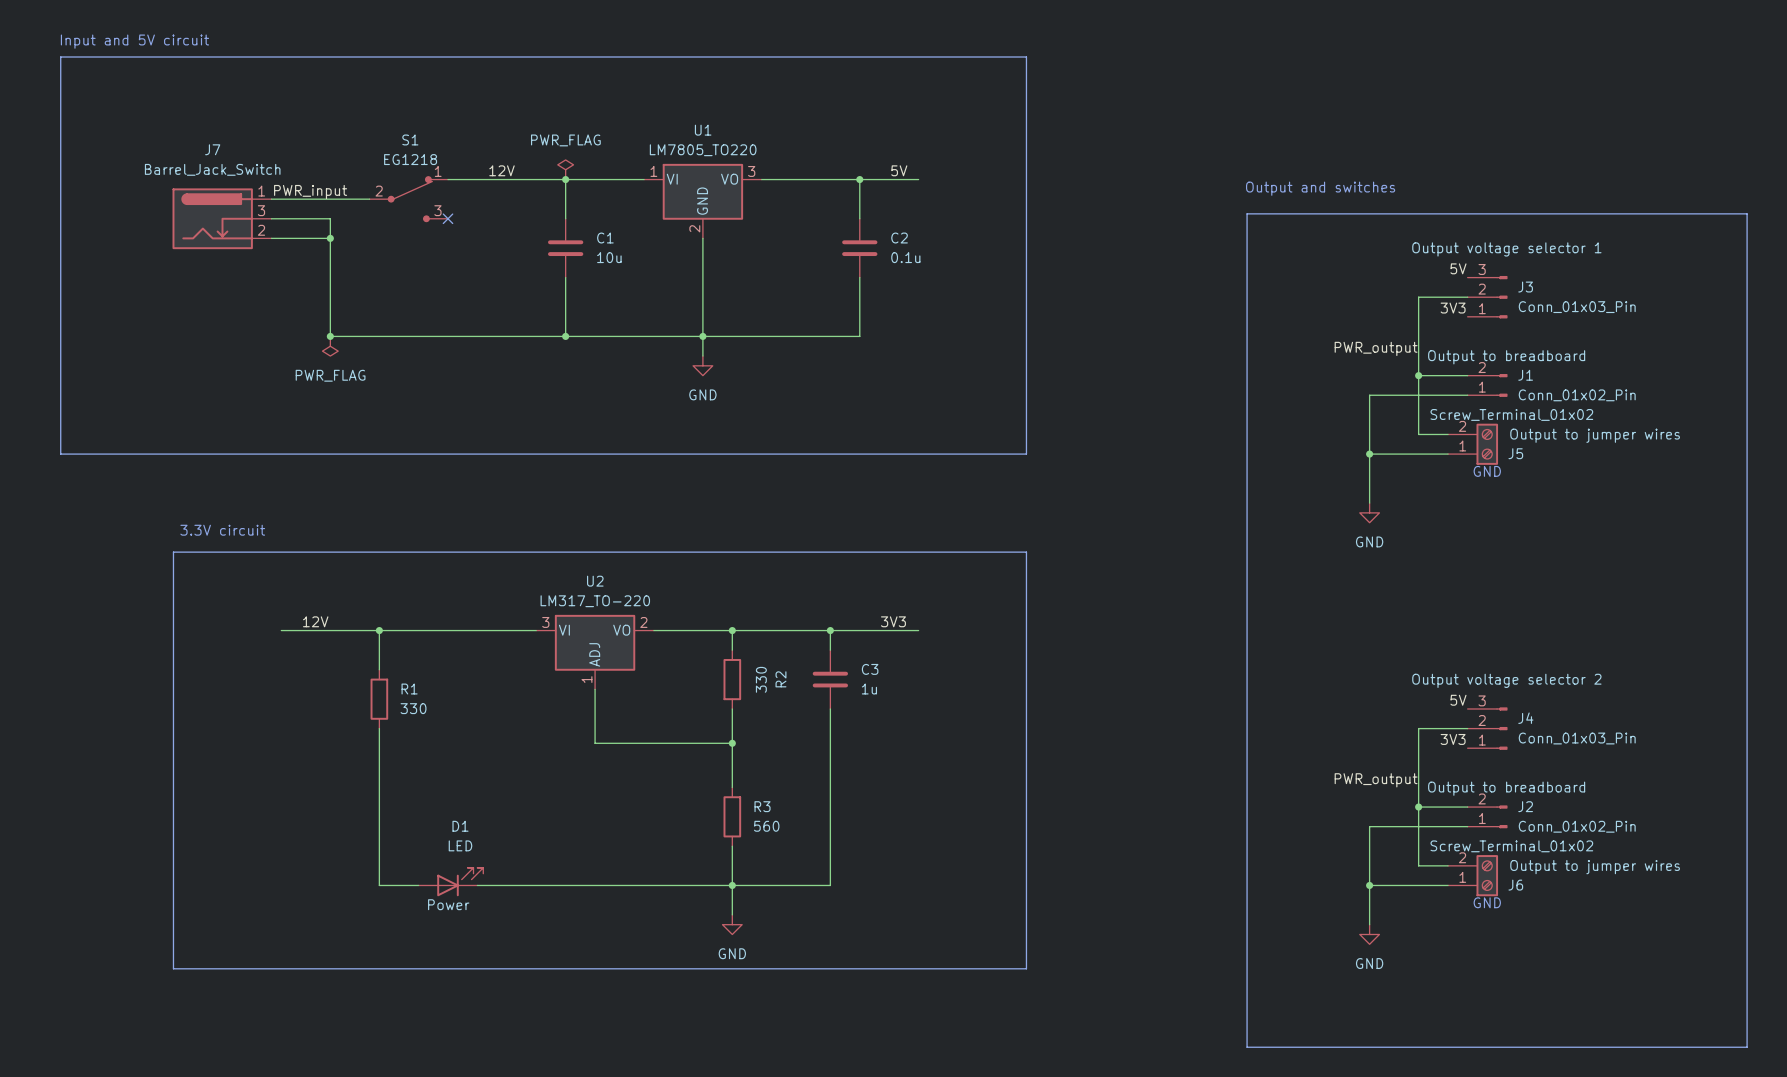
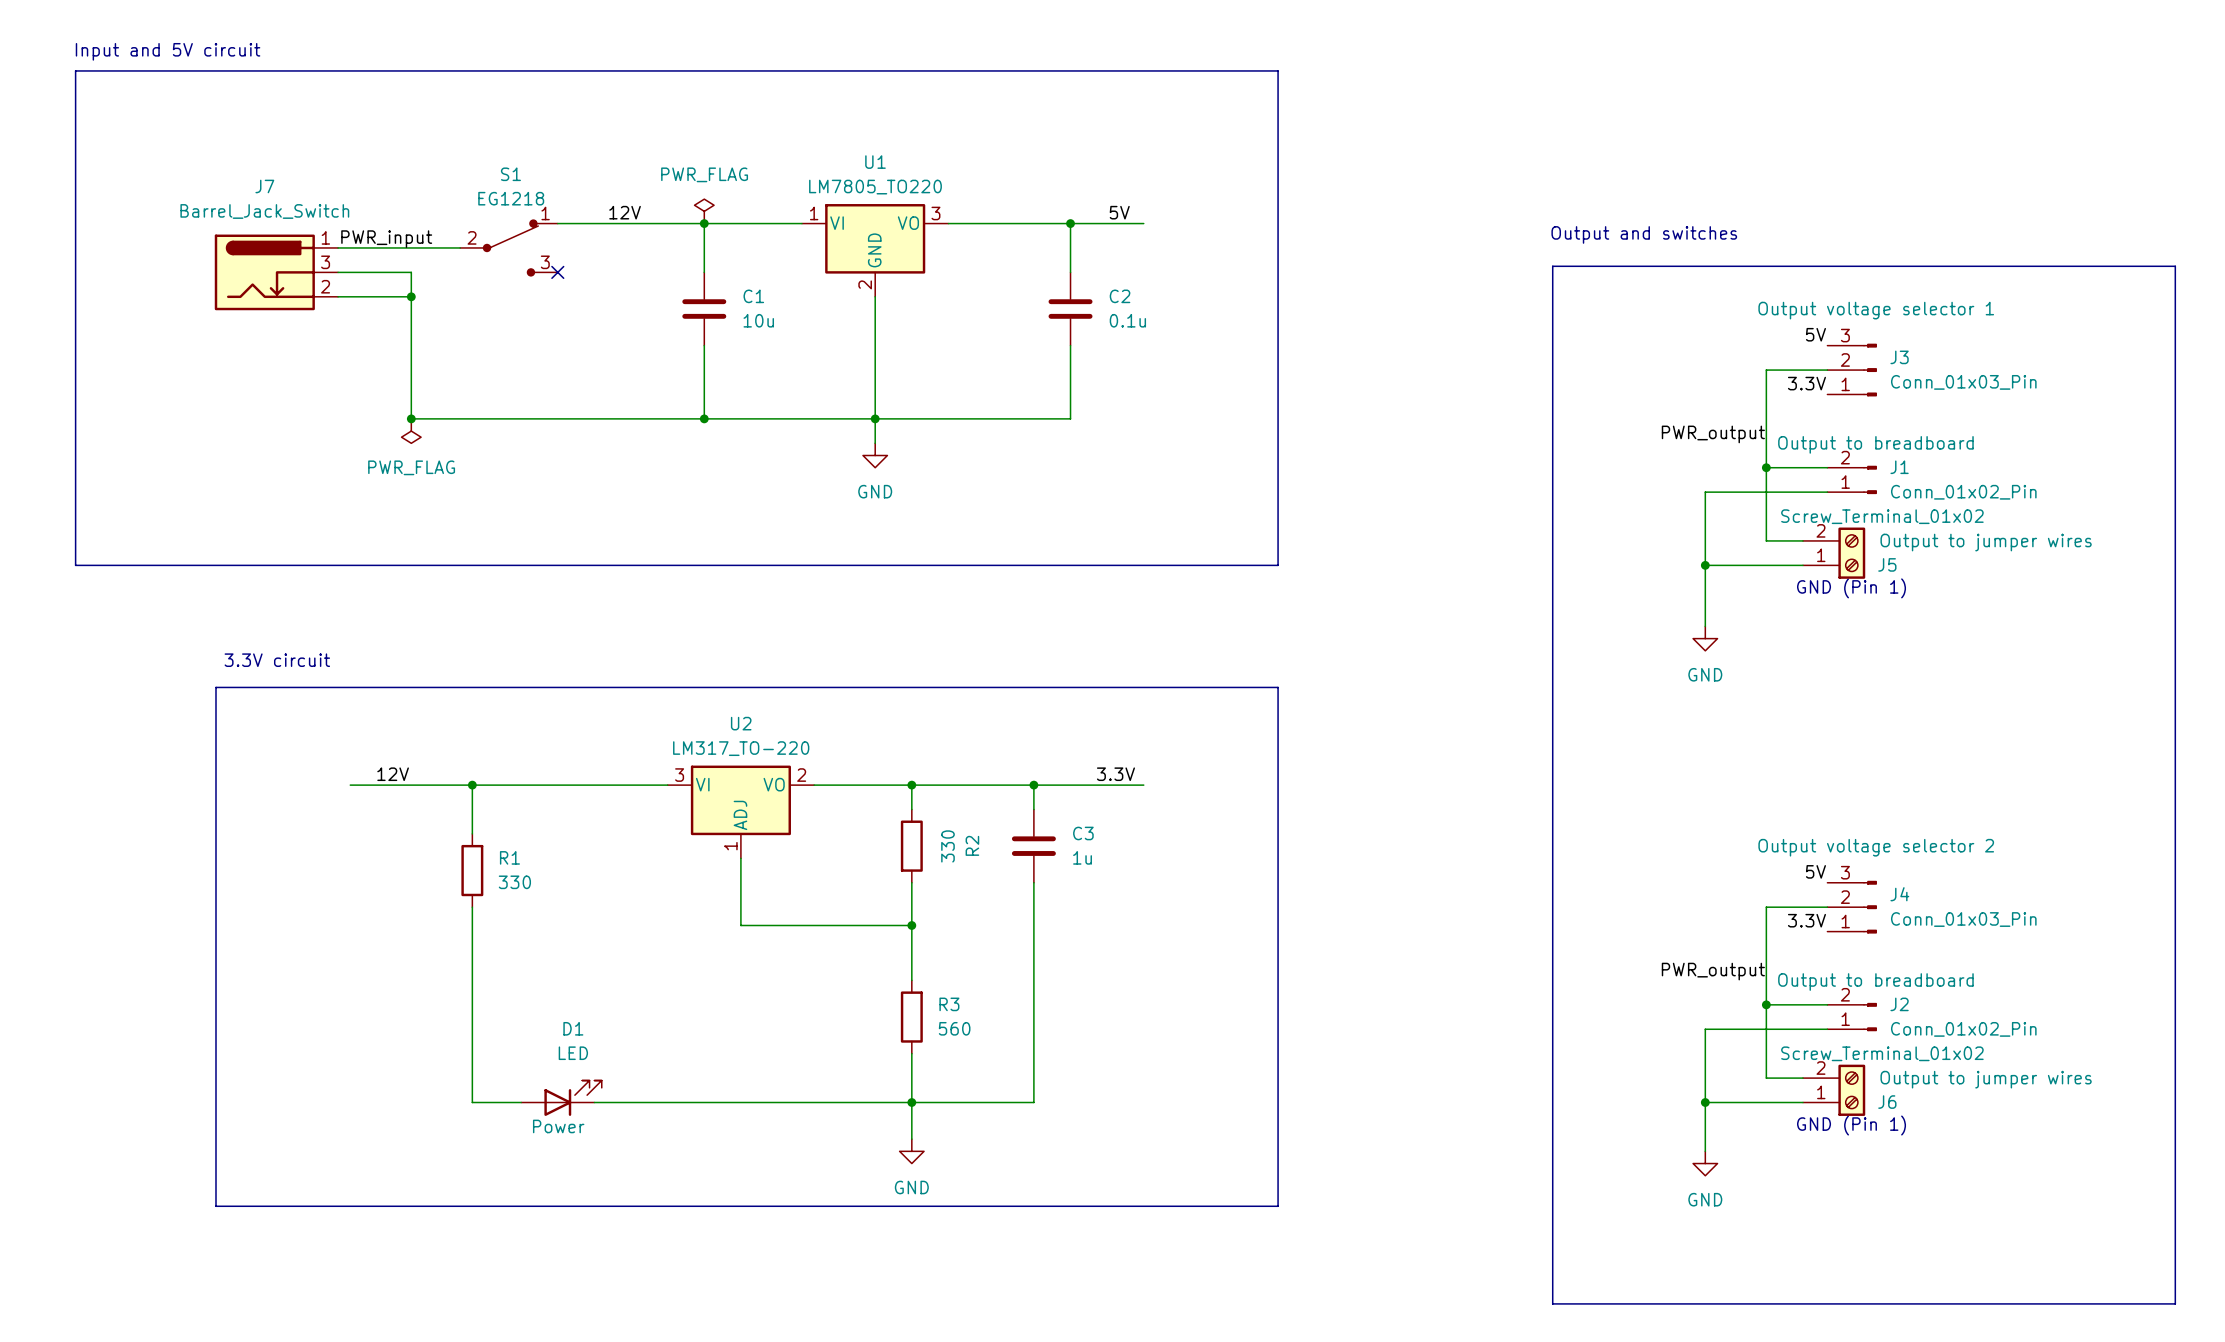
label: 3V3 (1453, 308) -> 3.3V (1806, 383)
text: GND (1487, 471) -> GND (Pin 1) (1851, 588)
label: 3V3 (893, 621) -> 3.3V (1115, 774)
label: 3V3 (1453, 739) -> 3.3V (1806, 920)
text: GND (1487, 902) -> GND (Pin 1) (1851, 1125)

